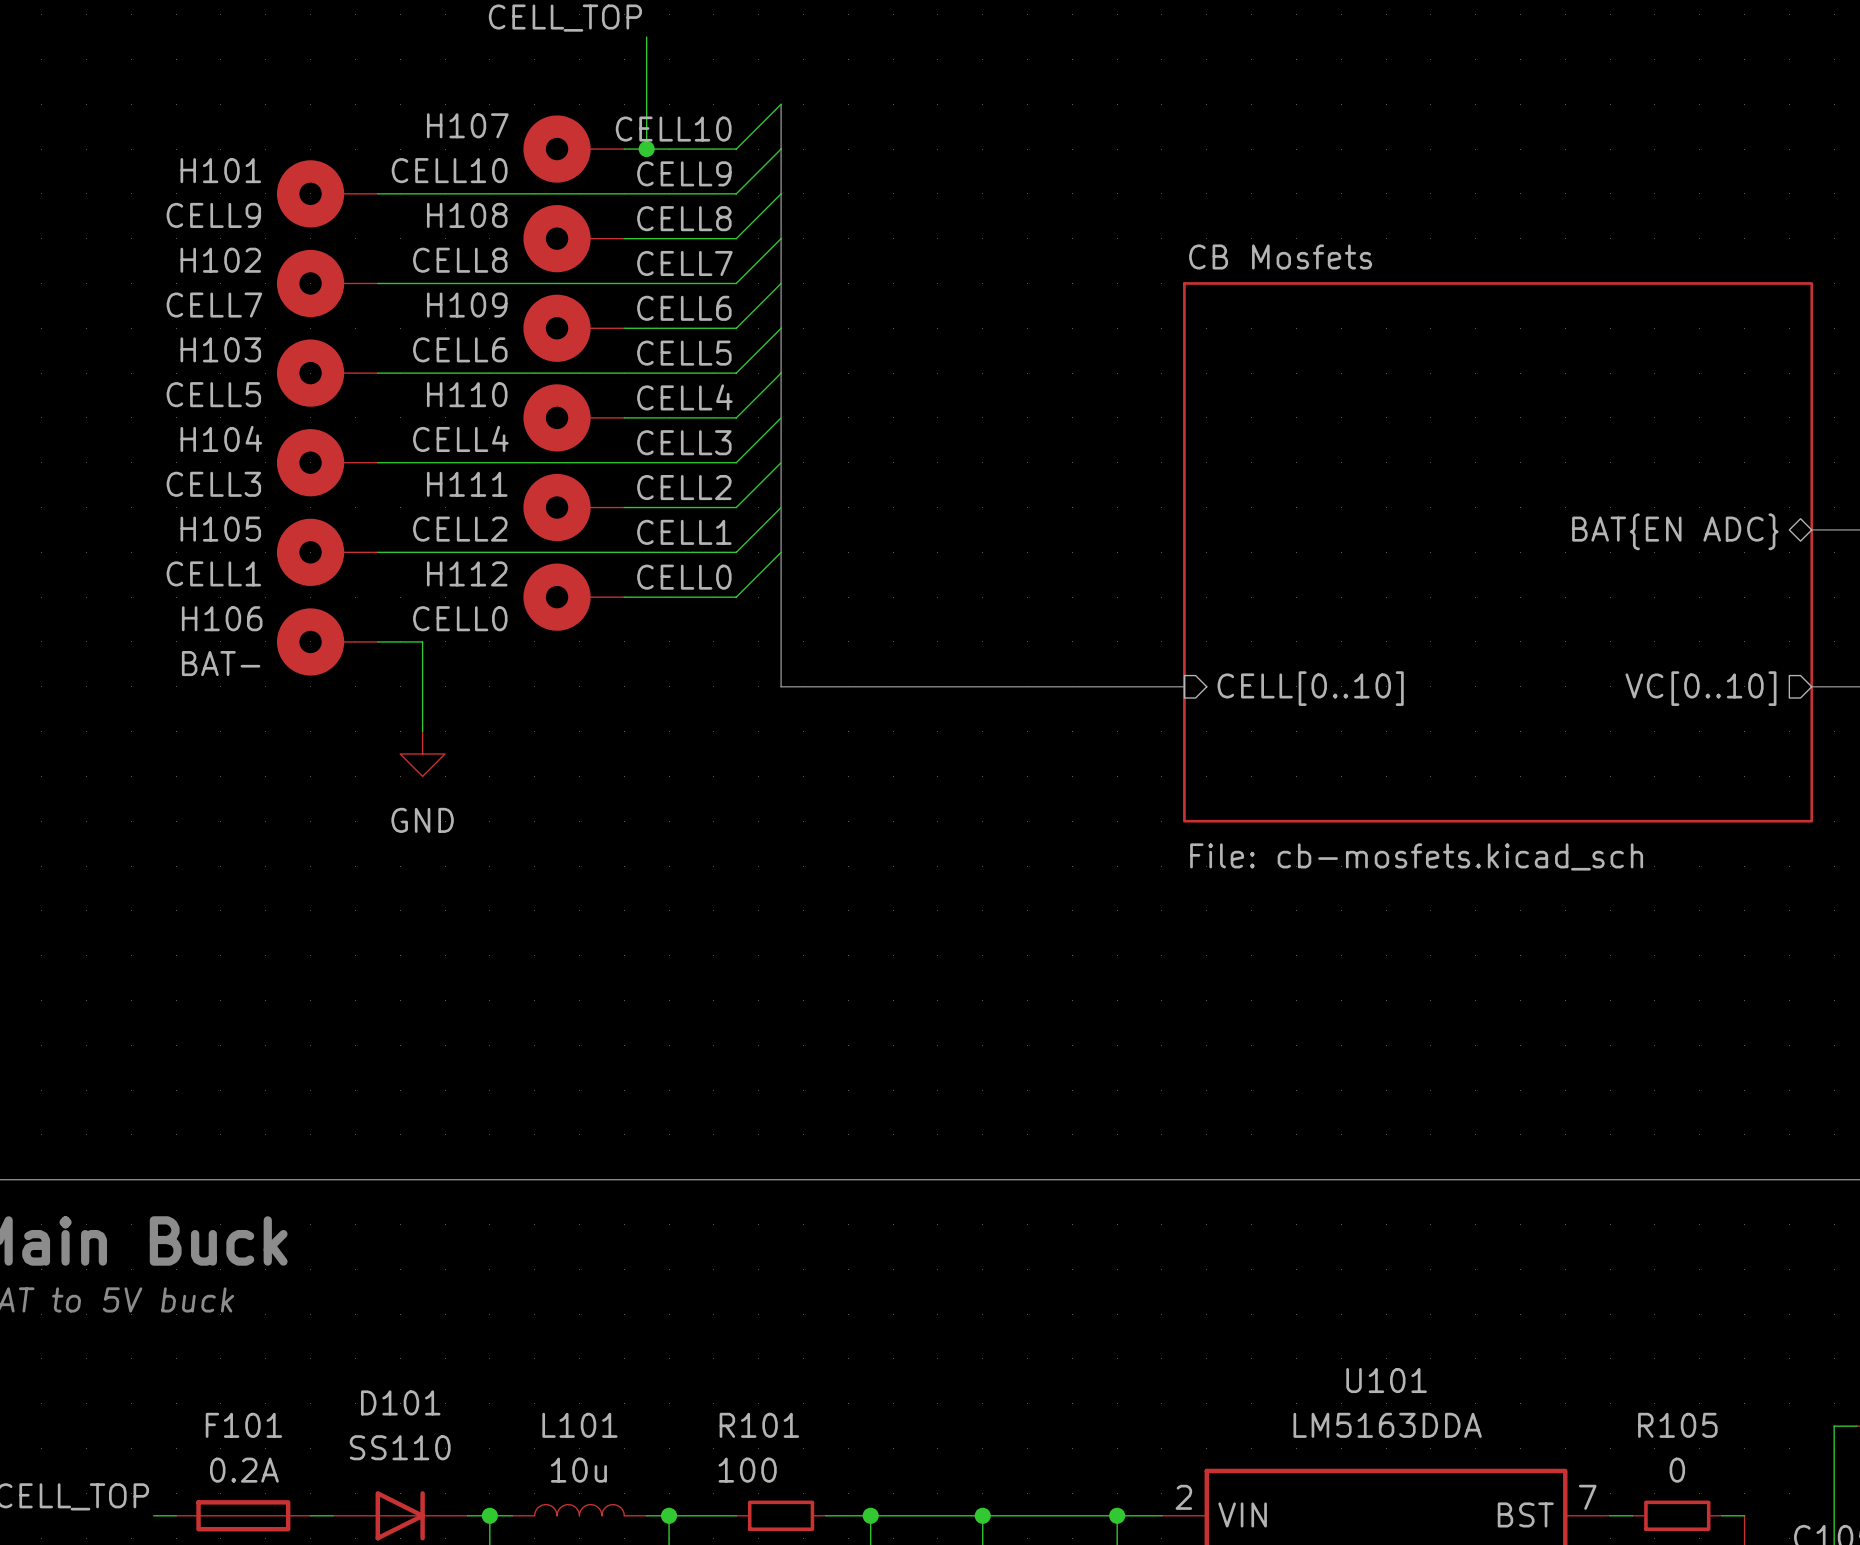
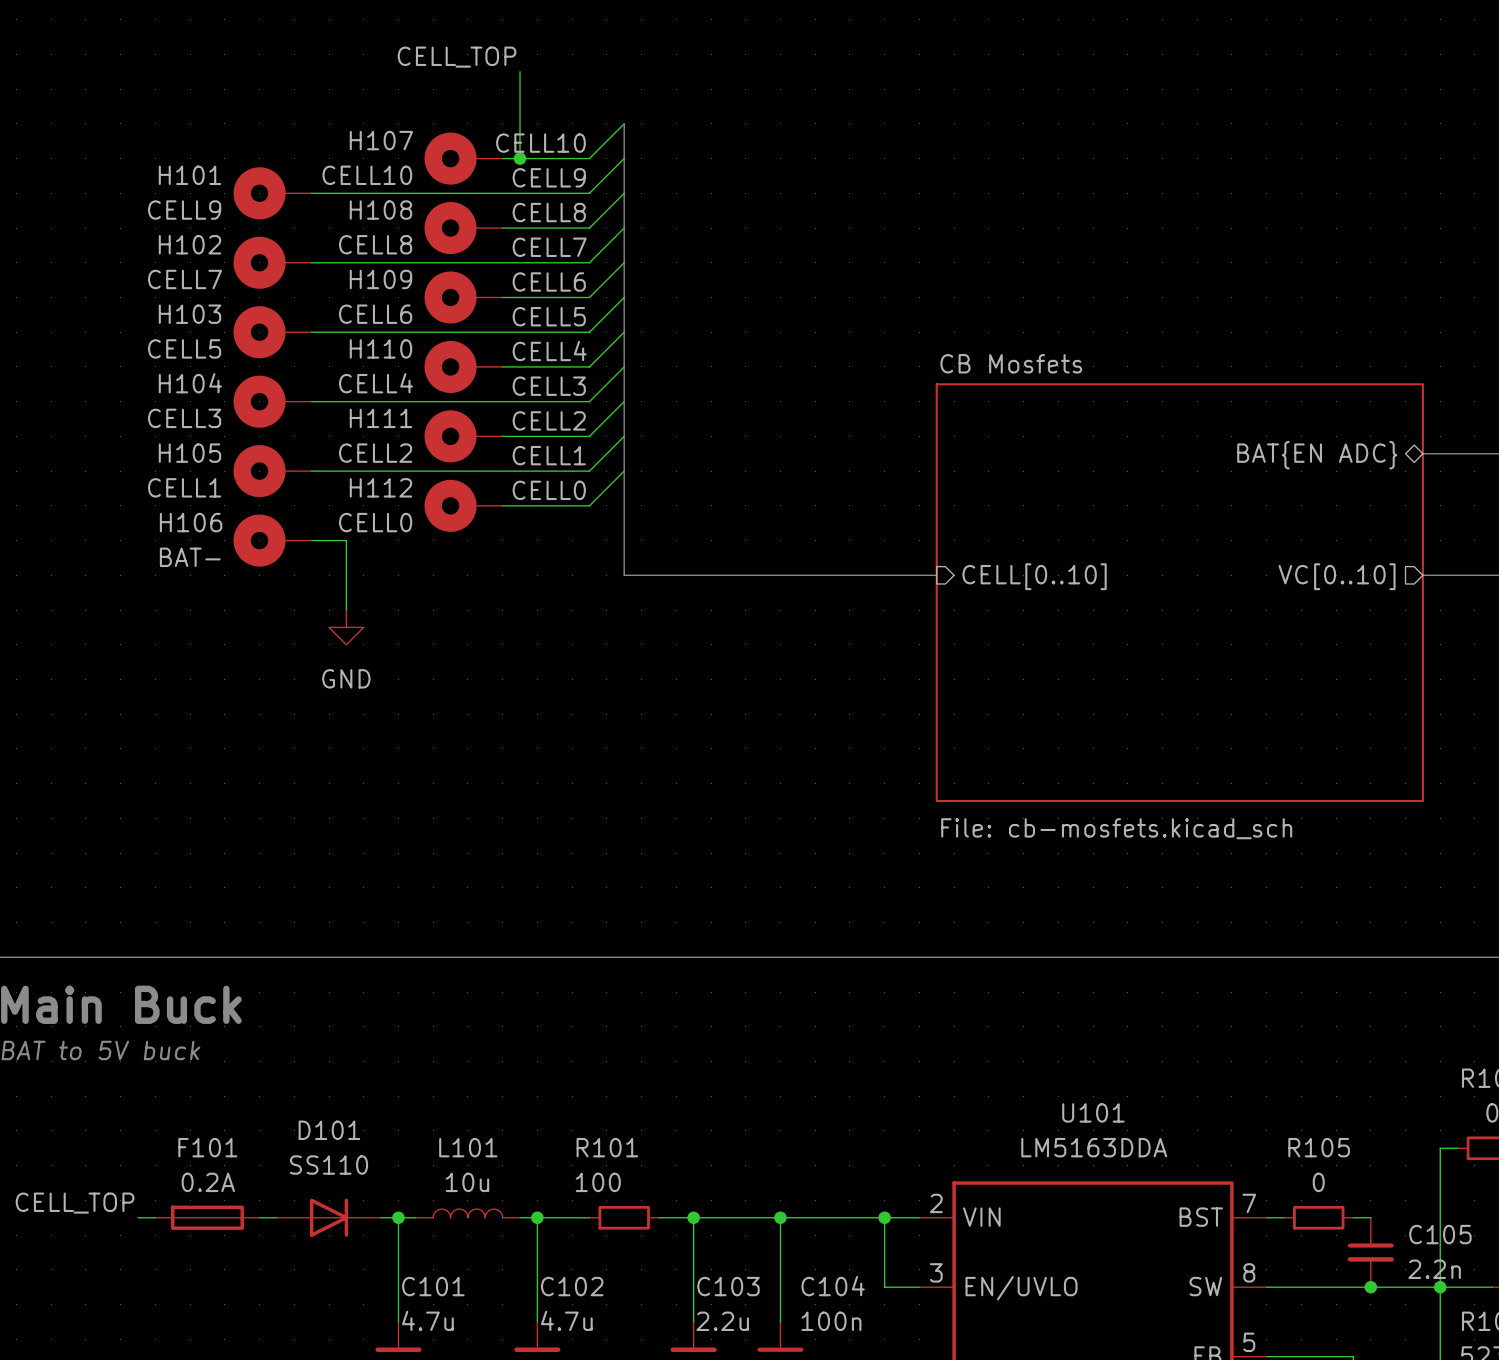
sheet CB Mosfets position: (1498, 552) -> (1179, 592)

